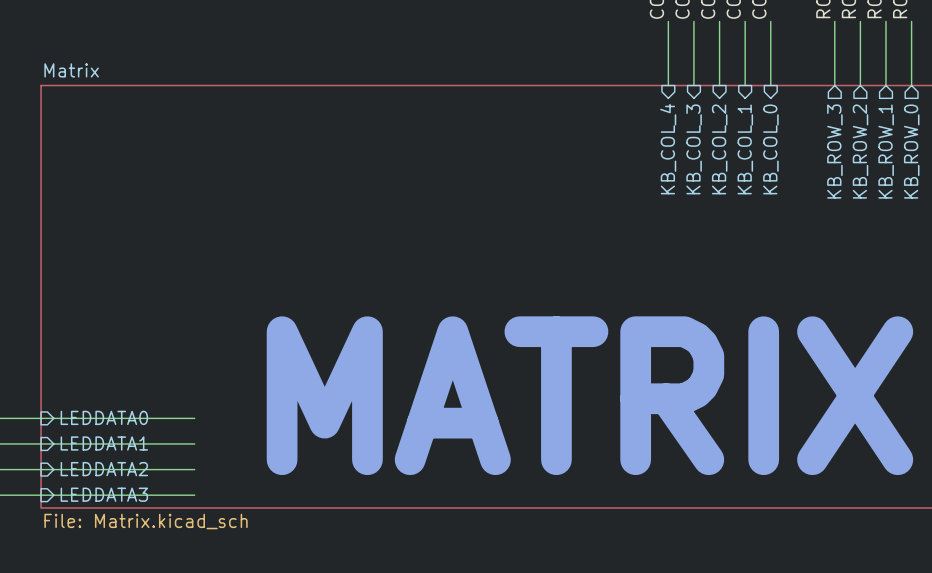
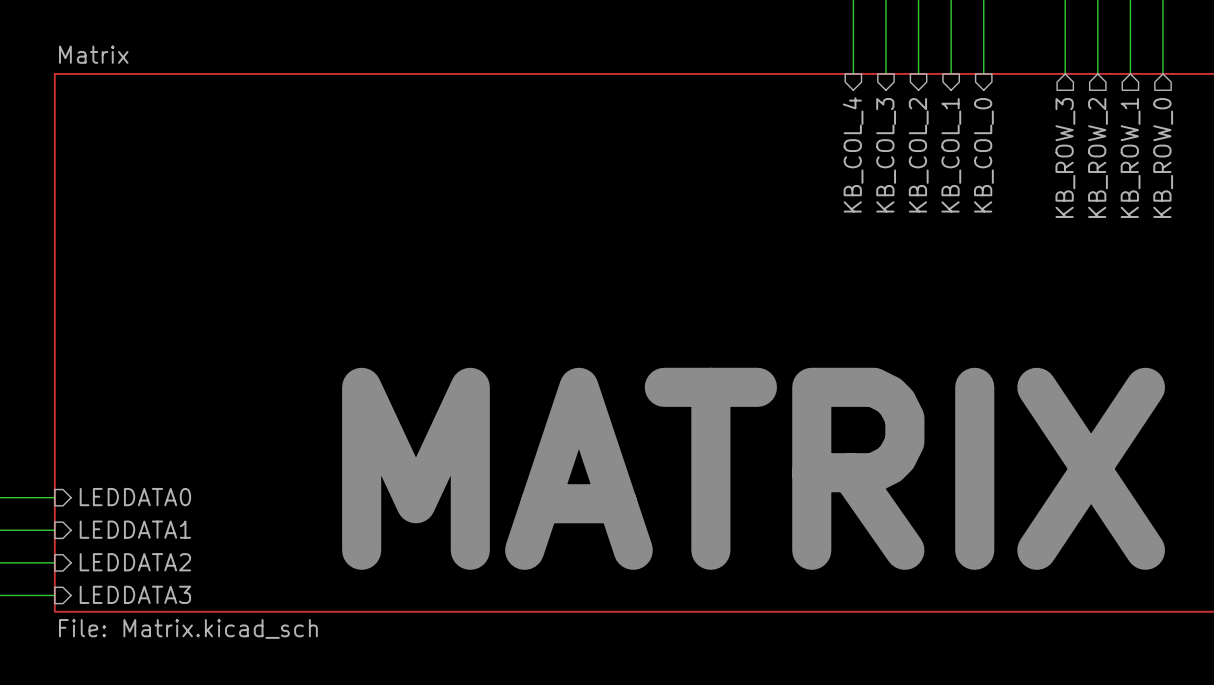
wire: (41, 418) (194, 418) -> none
wire: (41, 443) (194, 443) -> none
wire: (41, 469) (194, 469) -> none
wire: (41, 495) (194, 495) -> none

